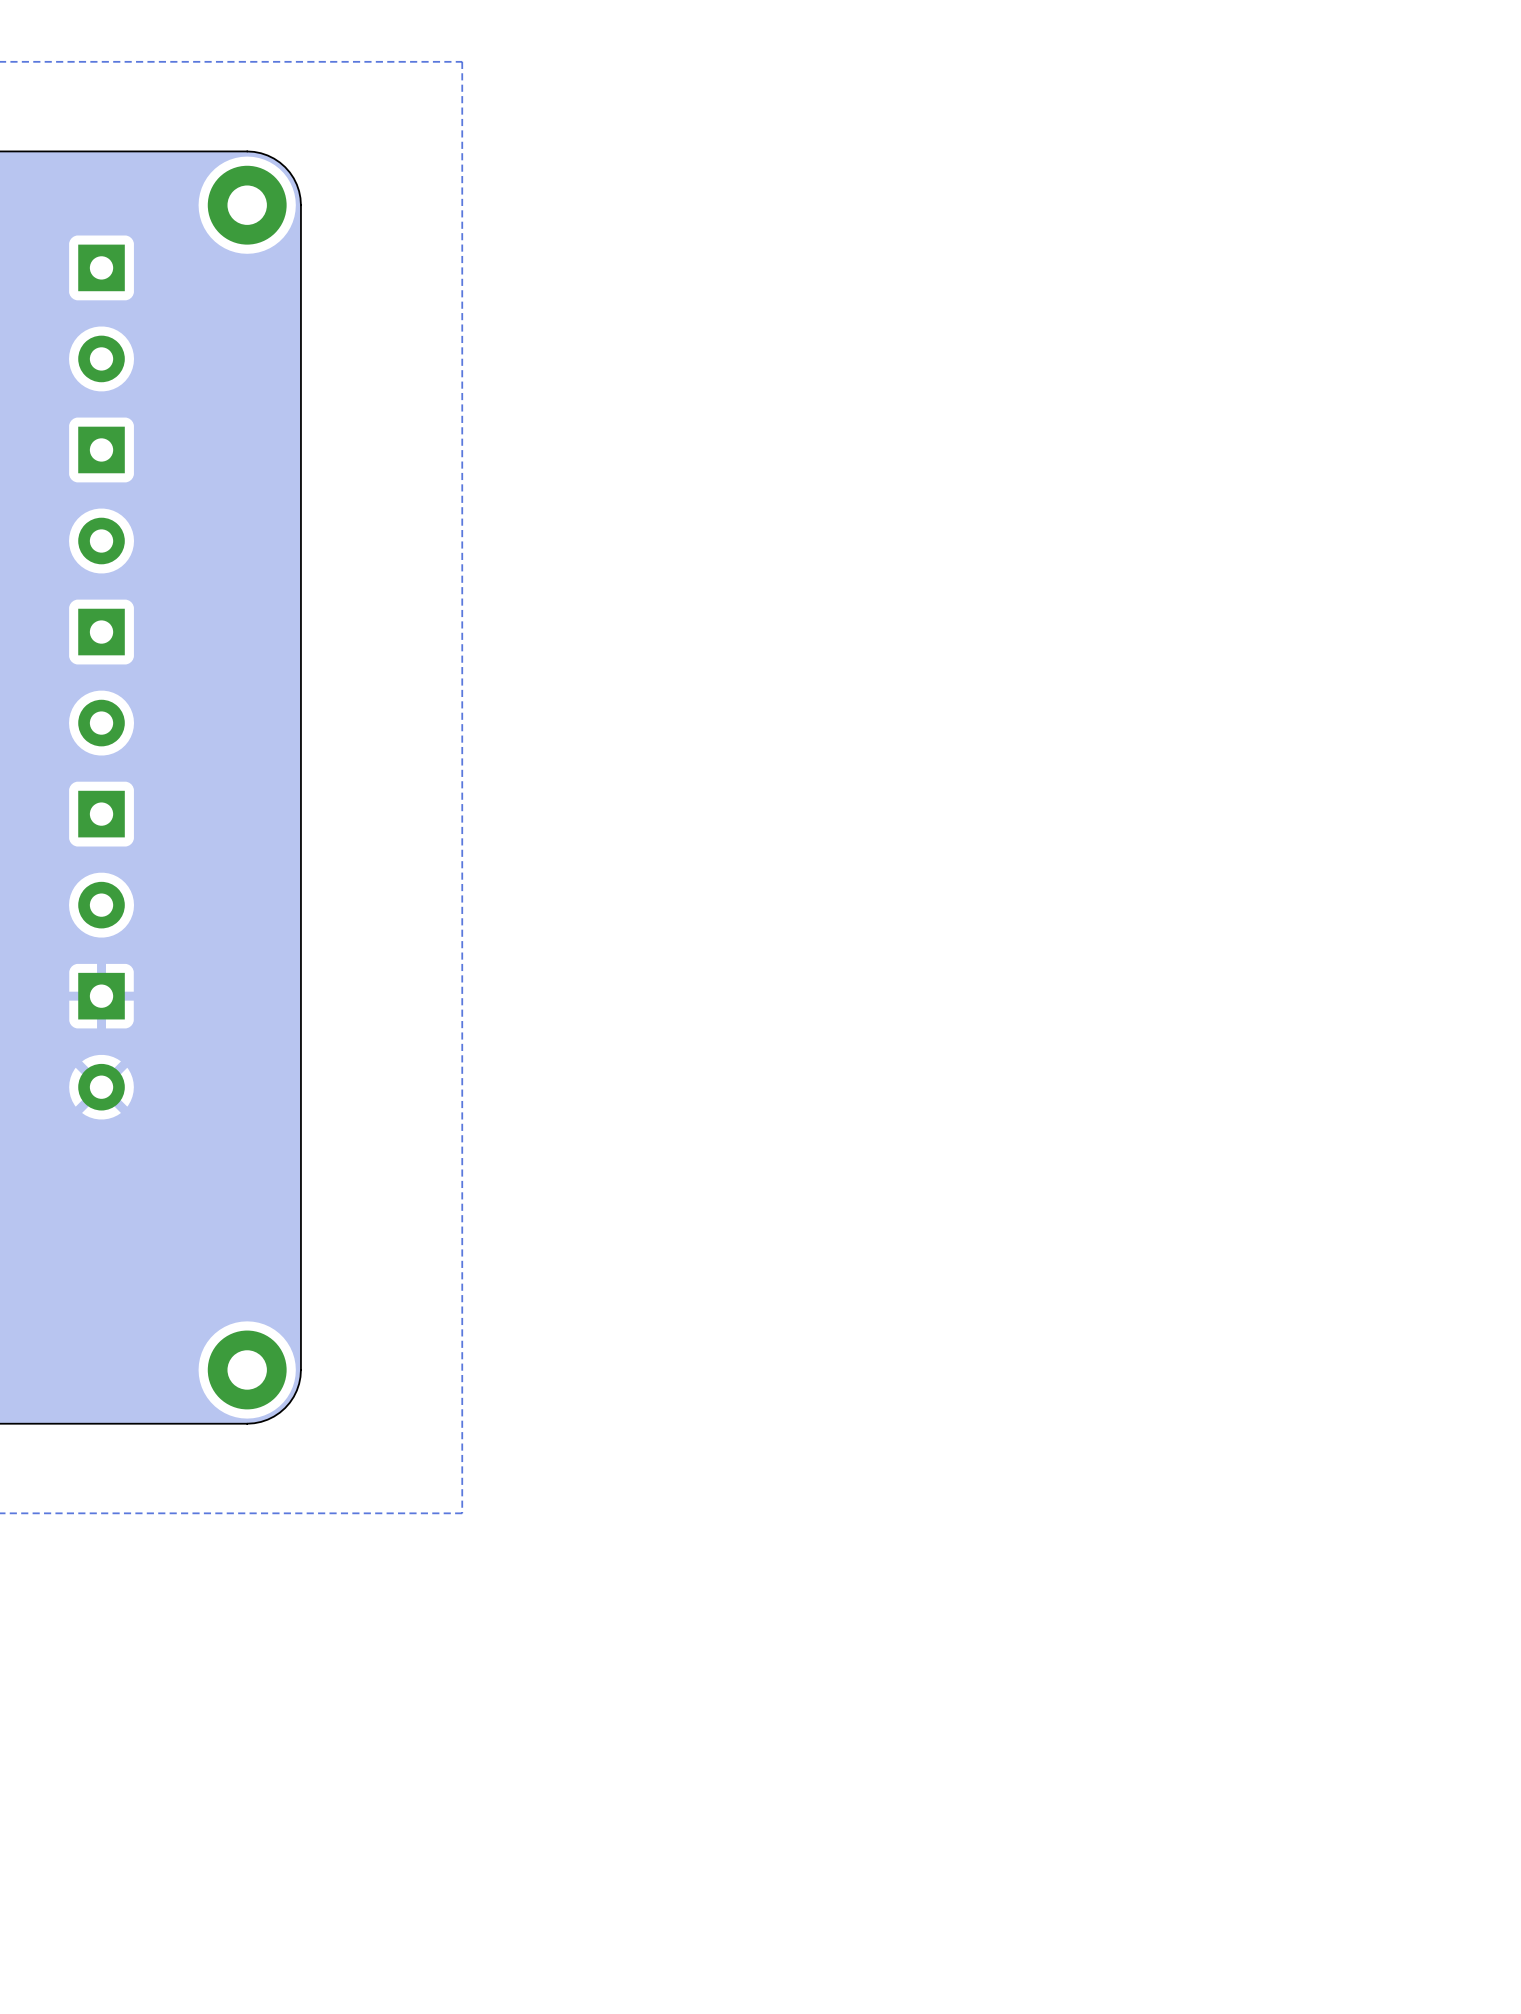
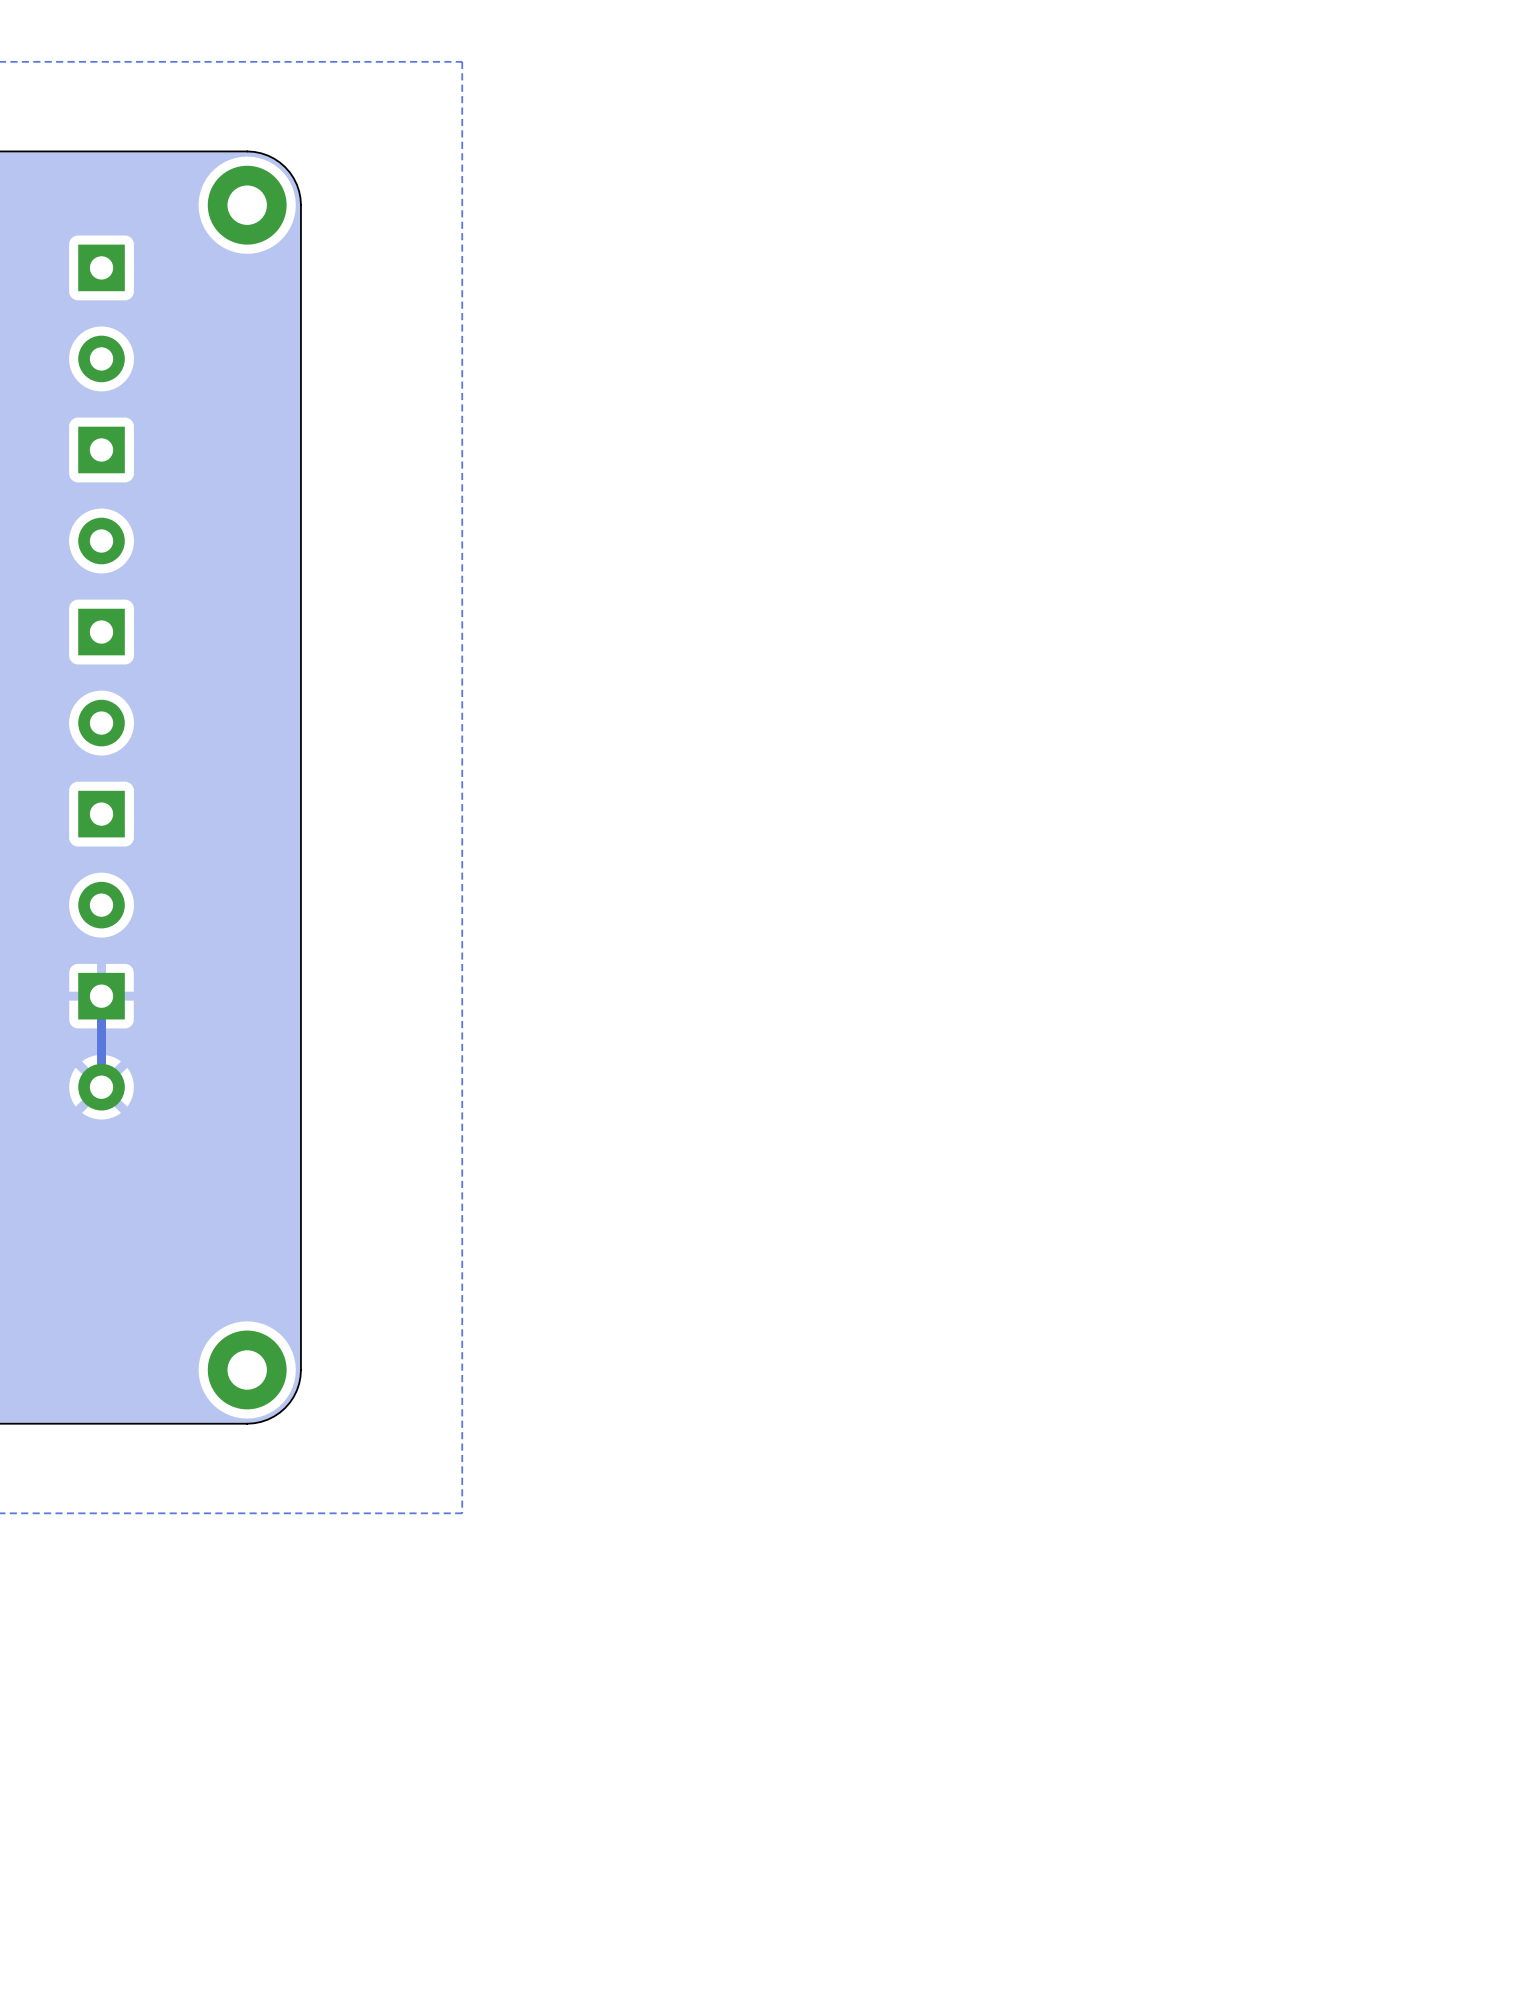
track: none -> (101, 996) (101, 1087)

